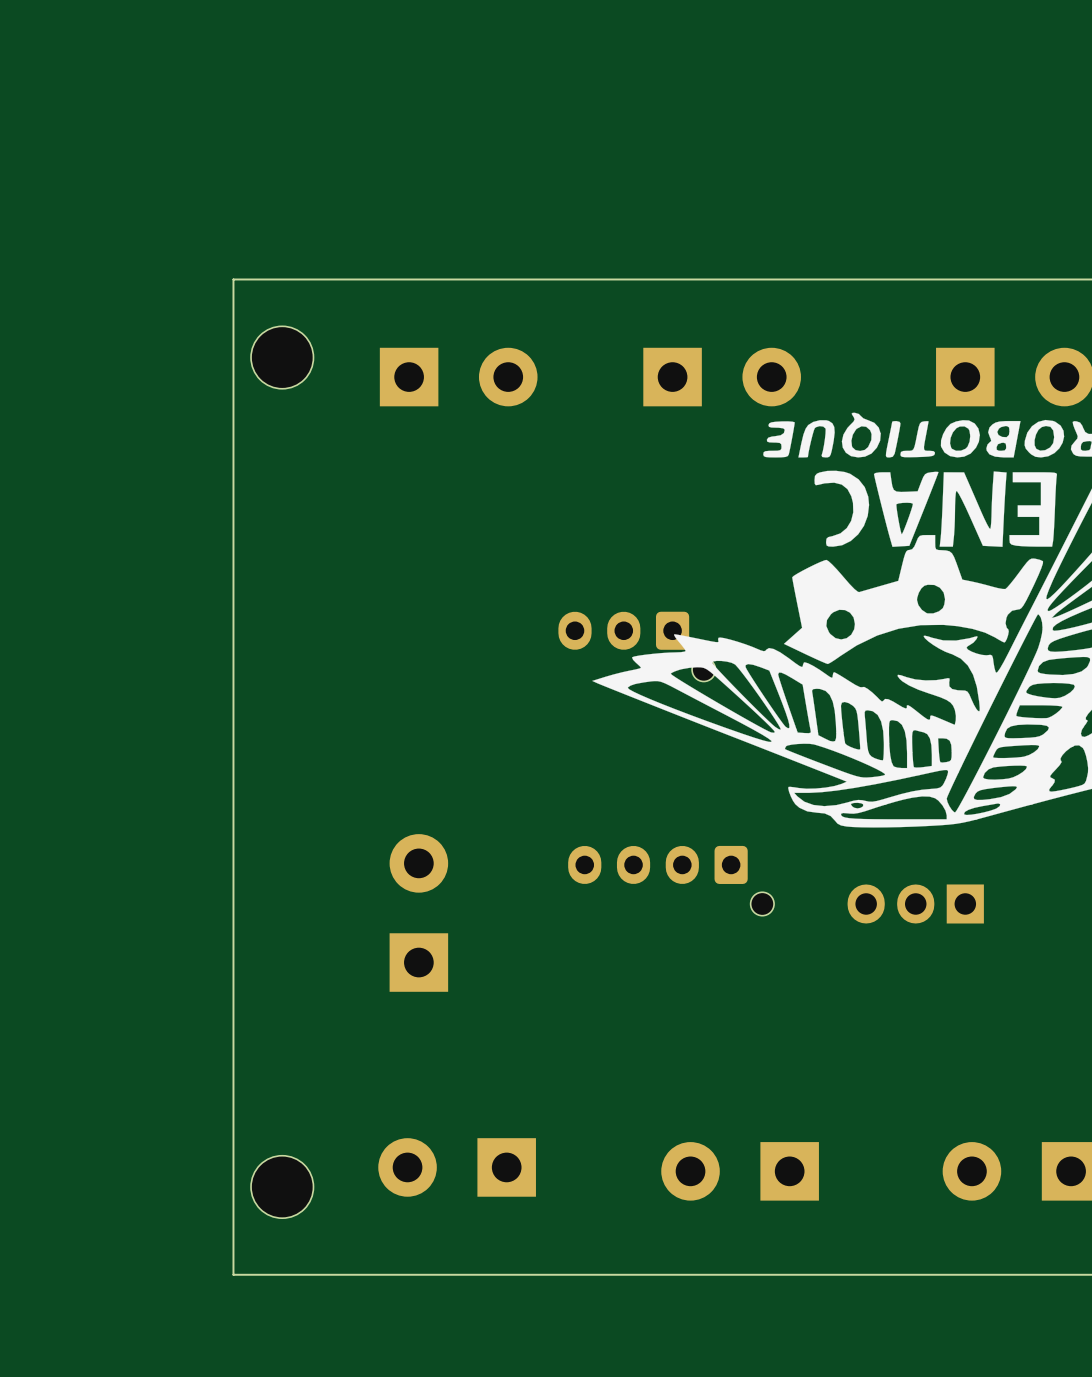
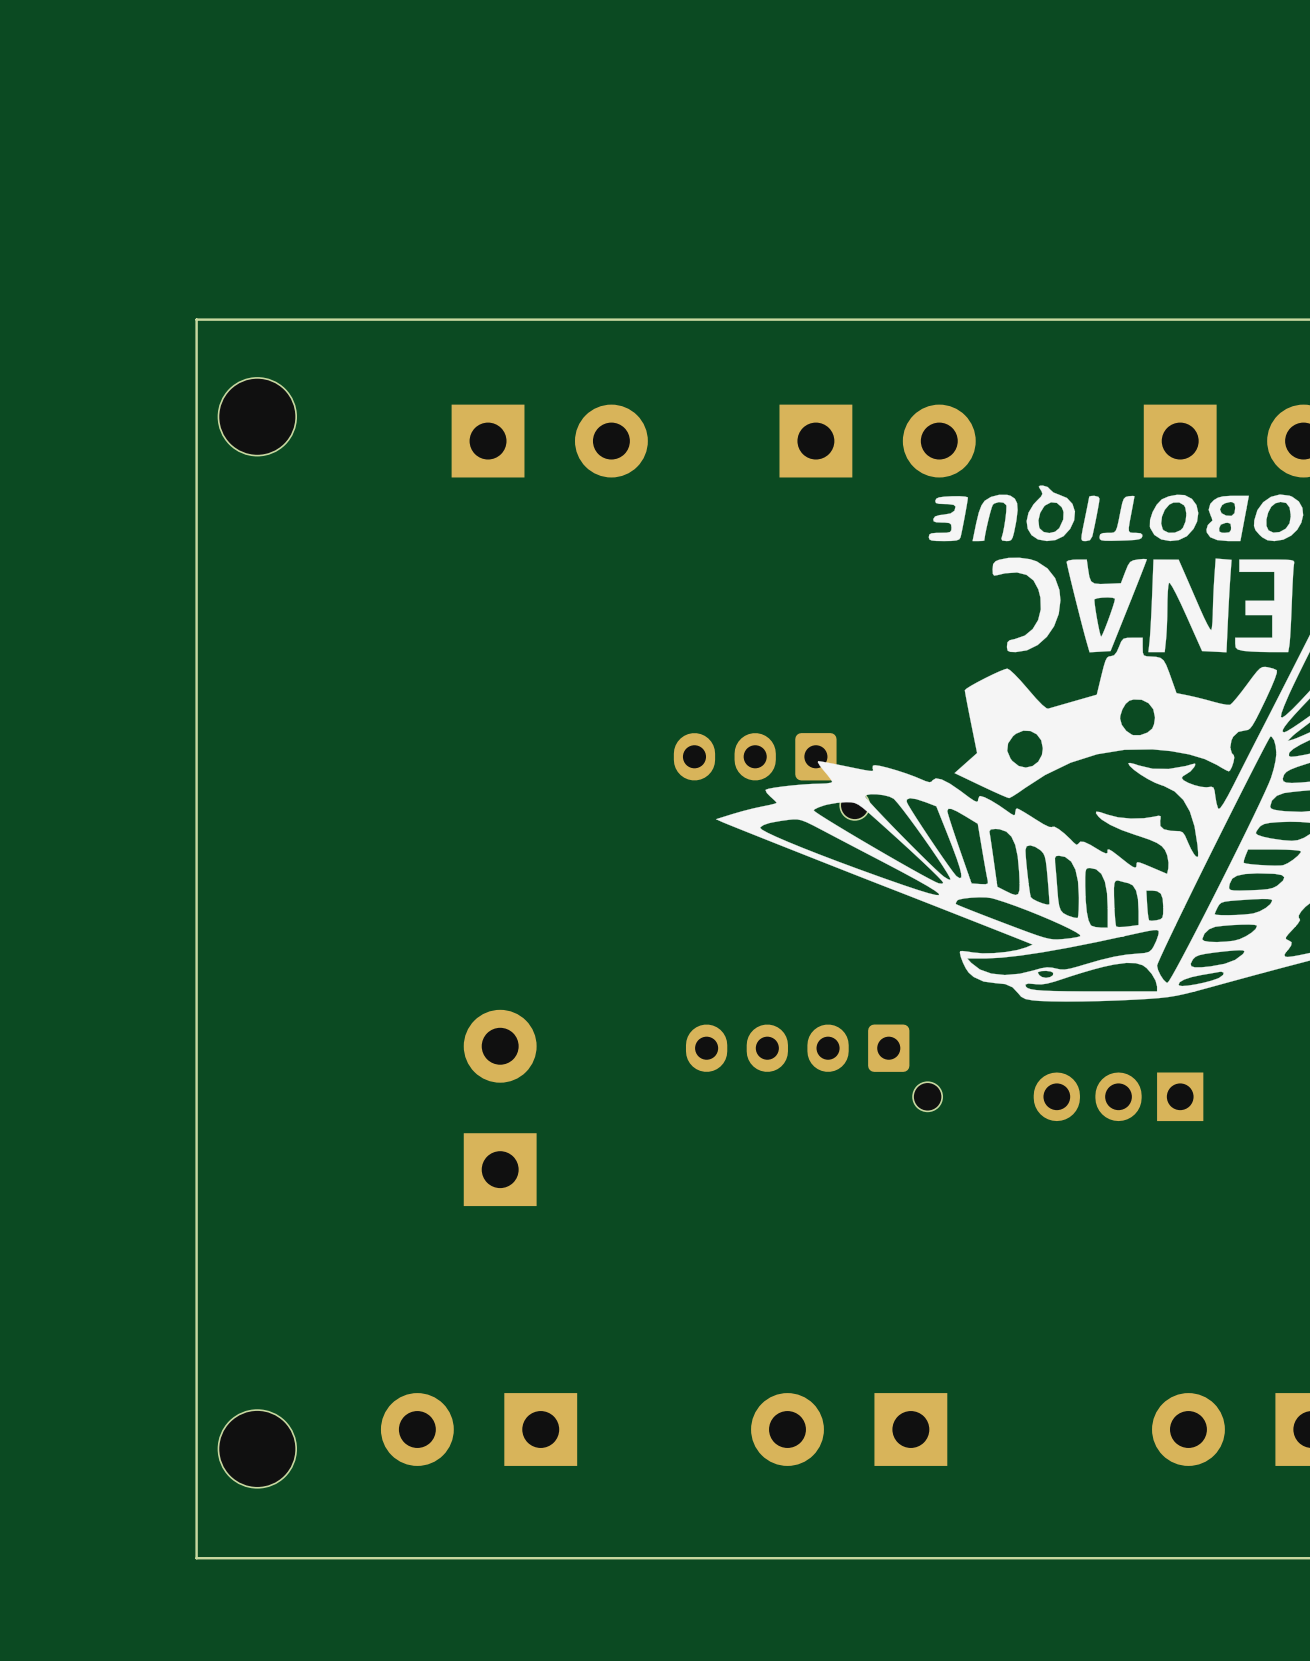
board edge: (233, 279) (233, 1274) -> (269, 319) (196, 319) (196, 1558) (269, 1558)
part position: (282, 357) -> (257, 416)
part position: (457, 1167) -> (479, 1429)
part position: (740, 1171) -> (849, 1429)
part position: (282, 1186) -> (257, 1448)

